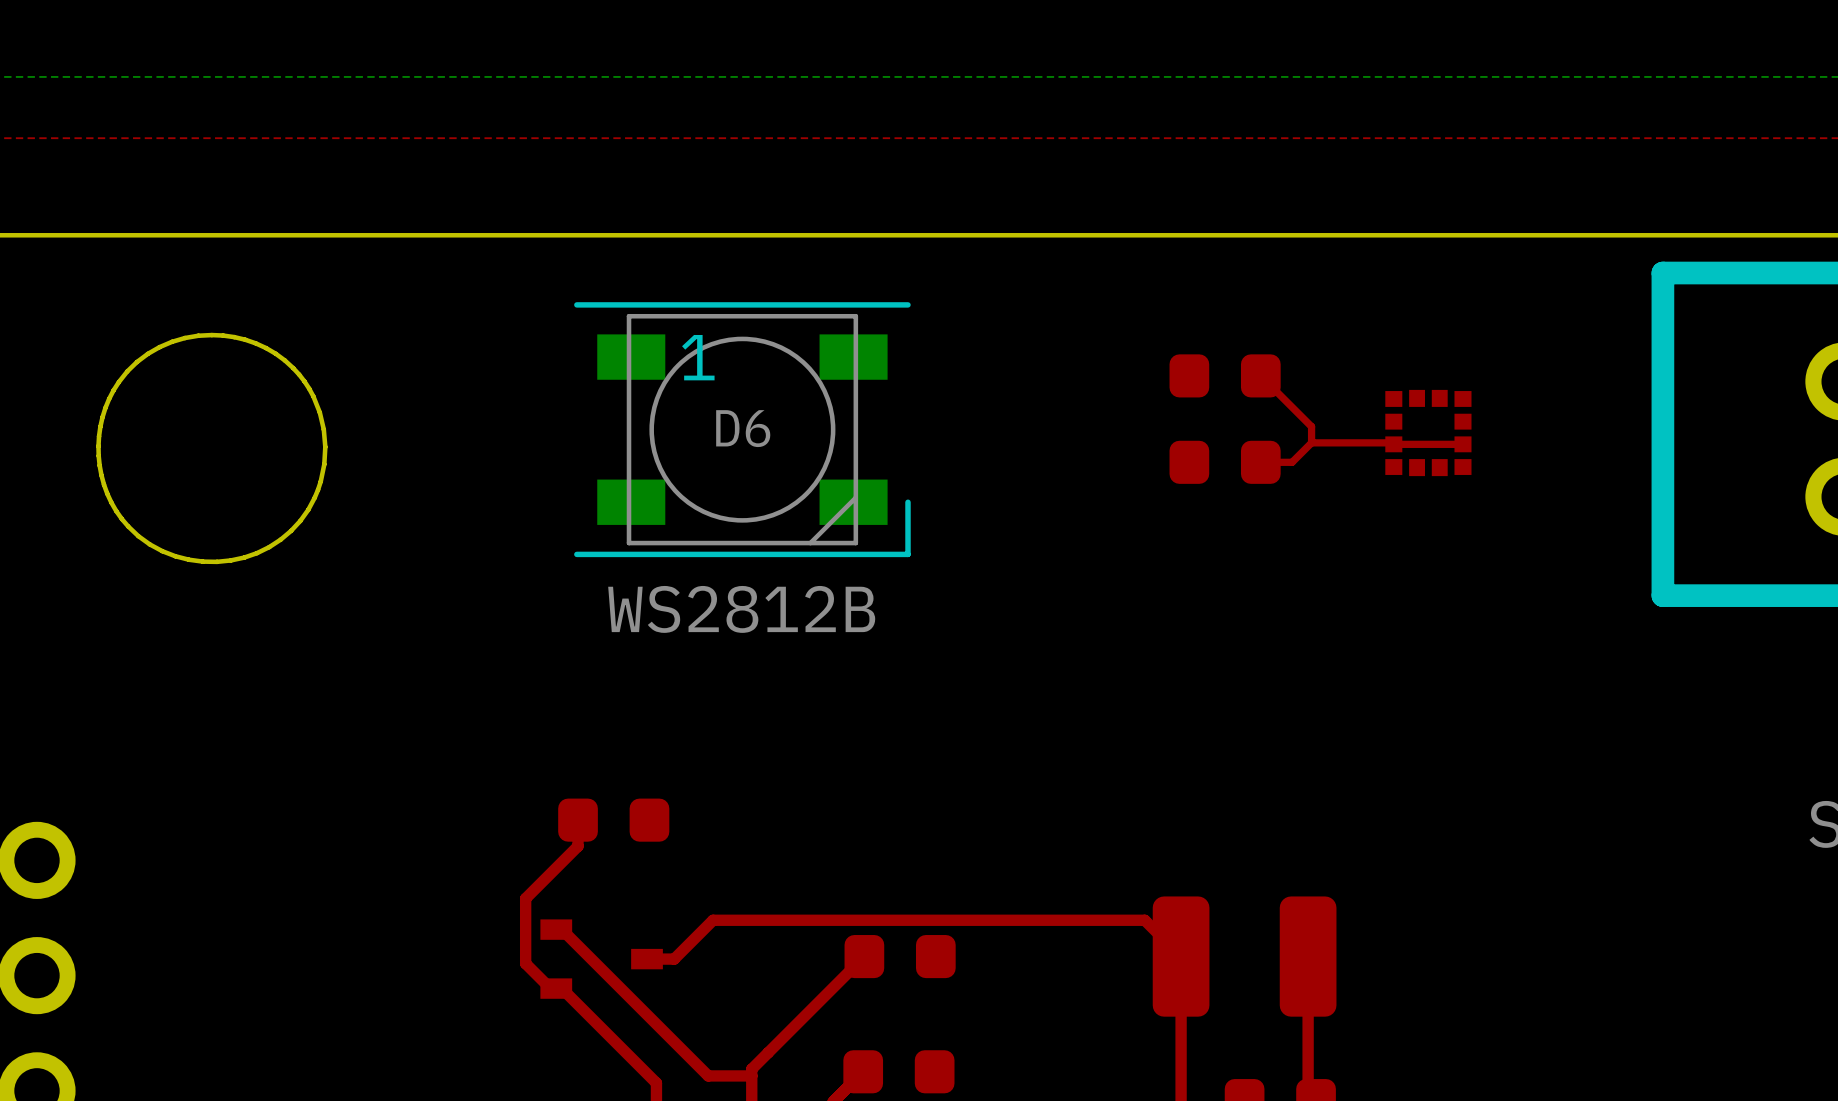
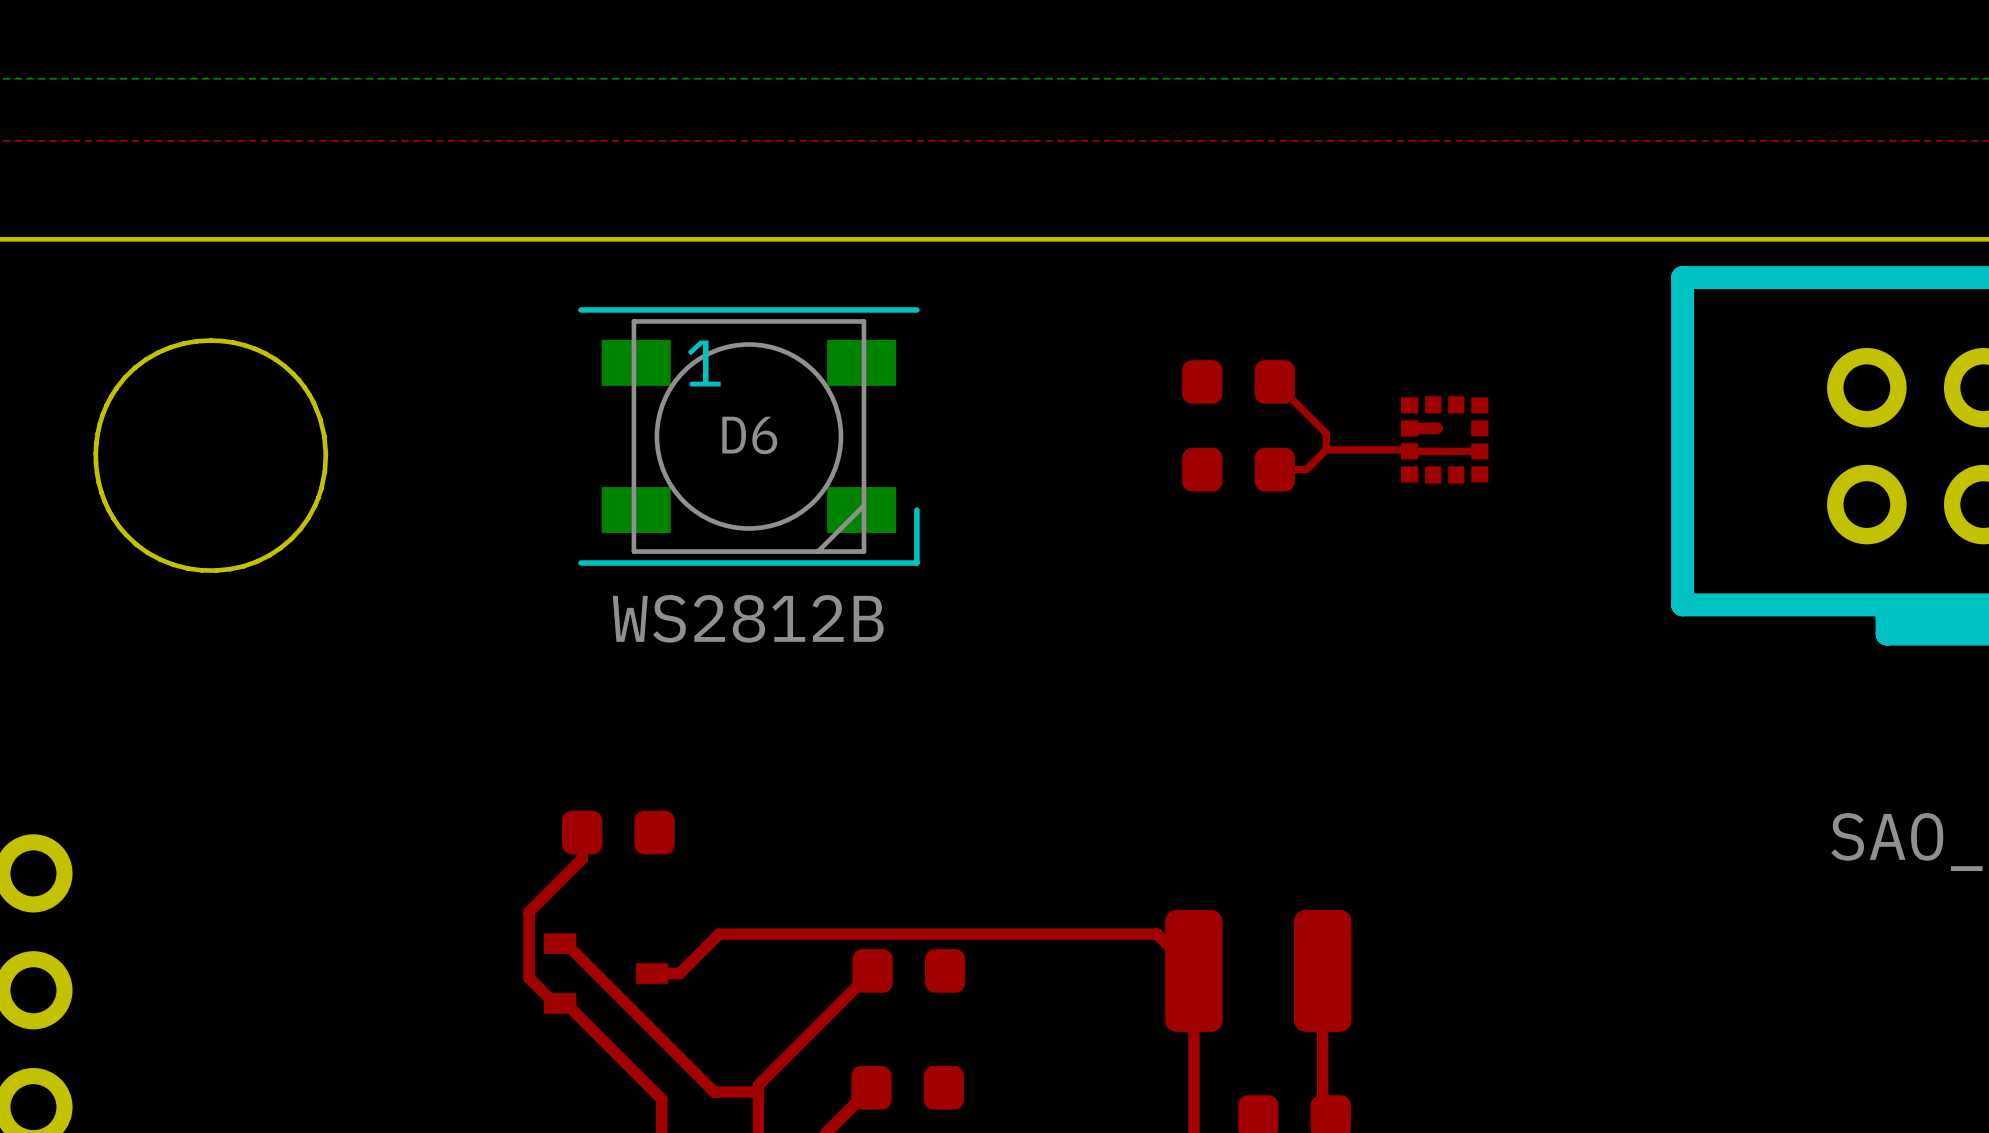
top track: none -> (1437, 428) (1409, 428)

